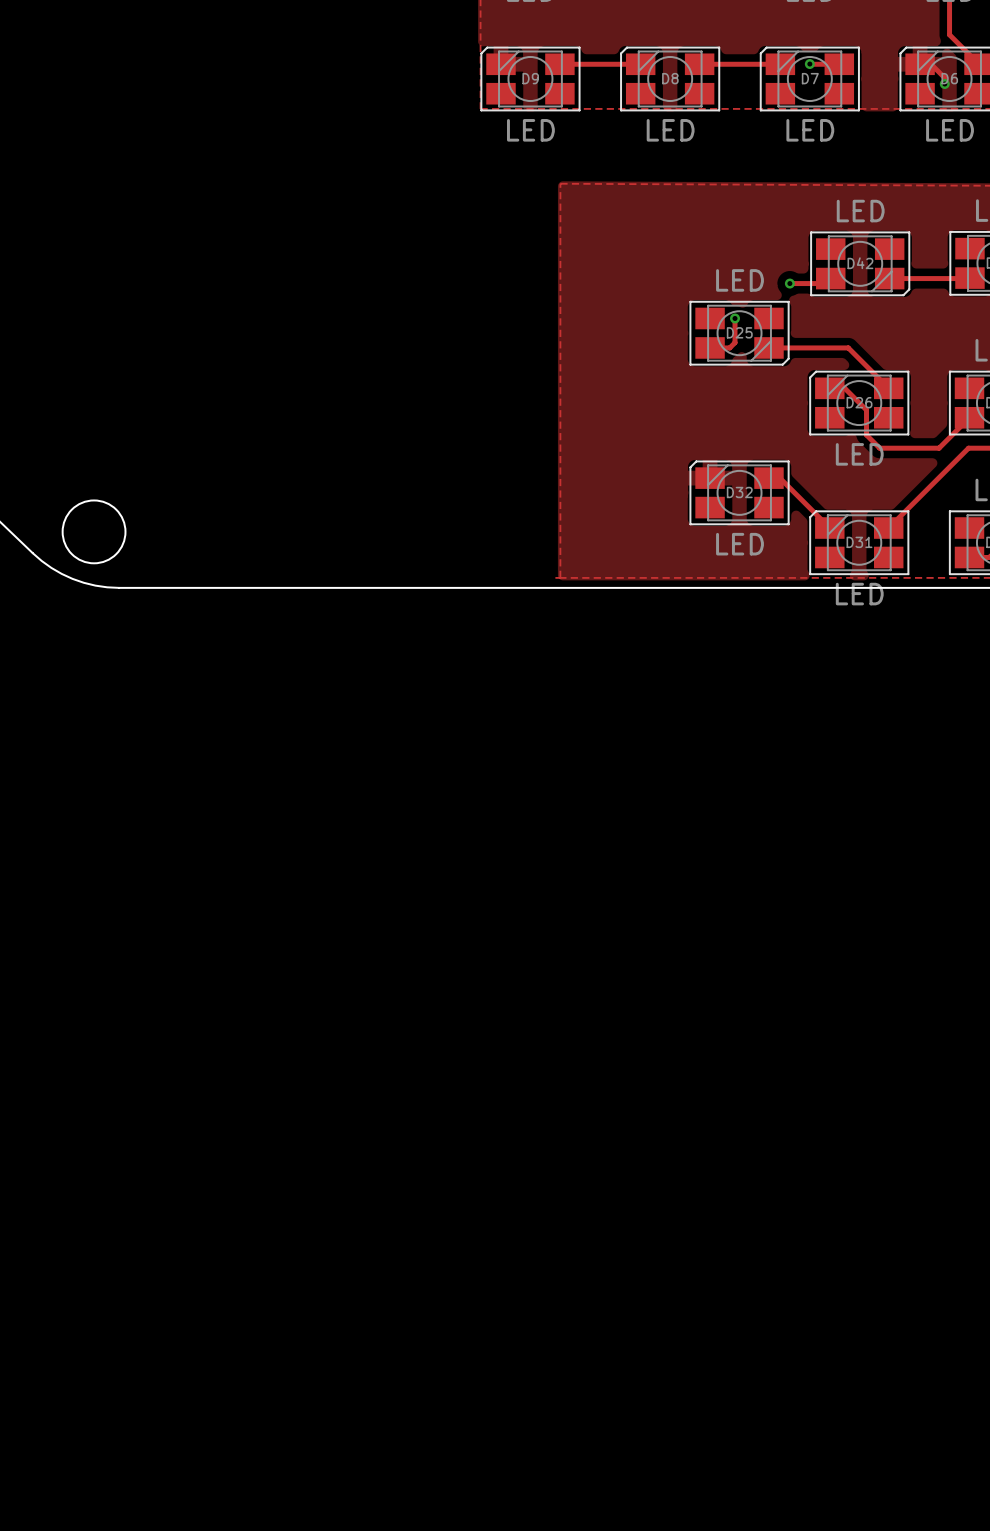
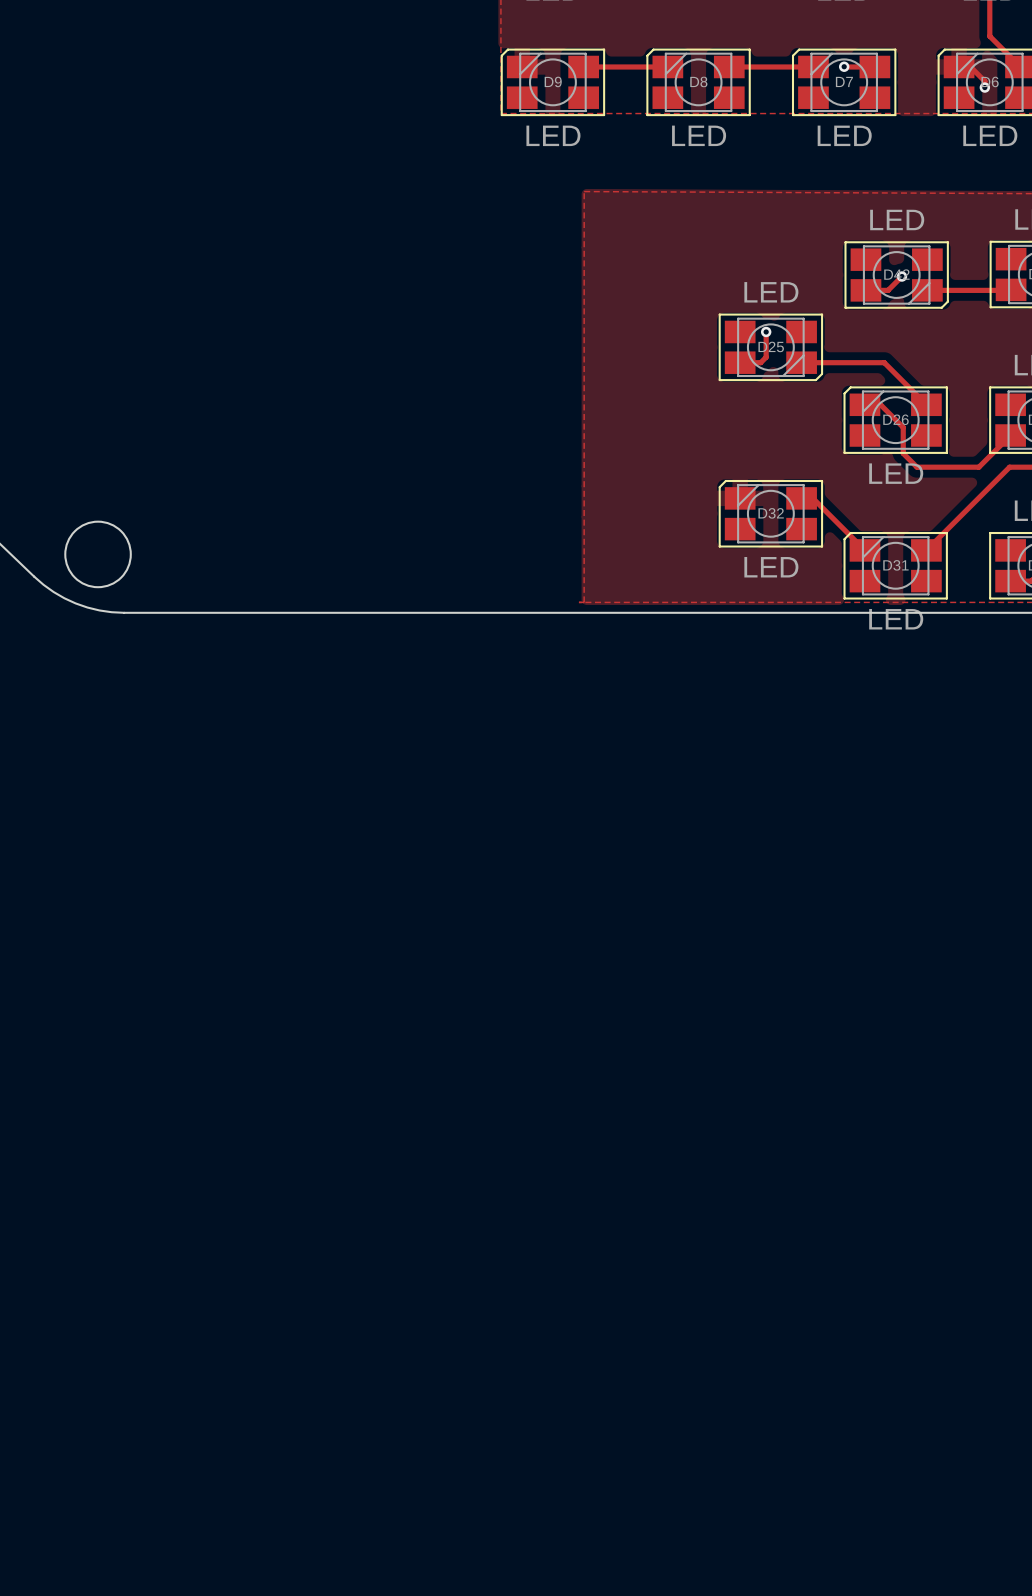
track: none -> (901, 276) (888, 290) (865, 290)
track: (789, 283) (825, 283) -> none
via position: (789, 283) -> (901, 276)

